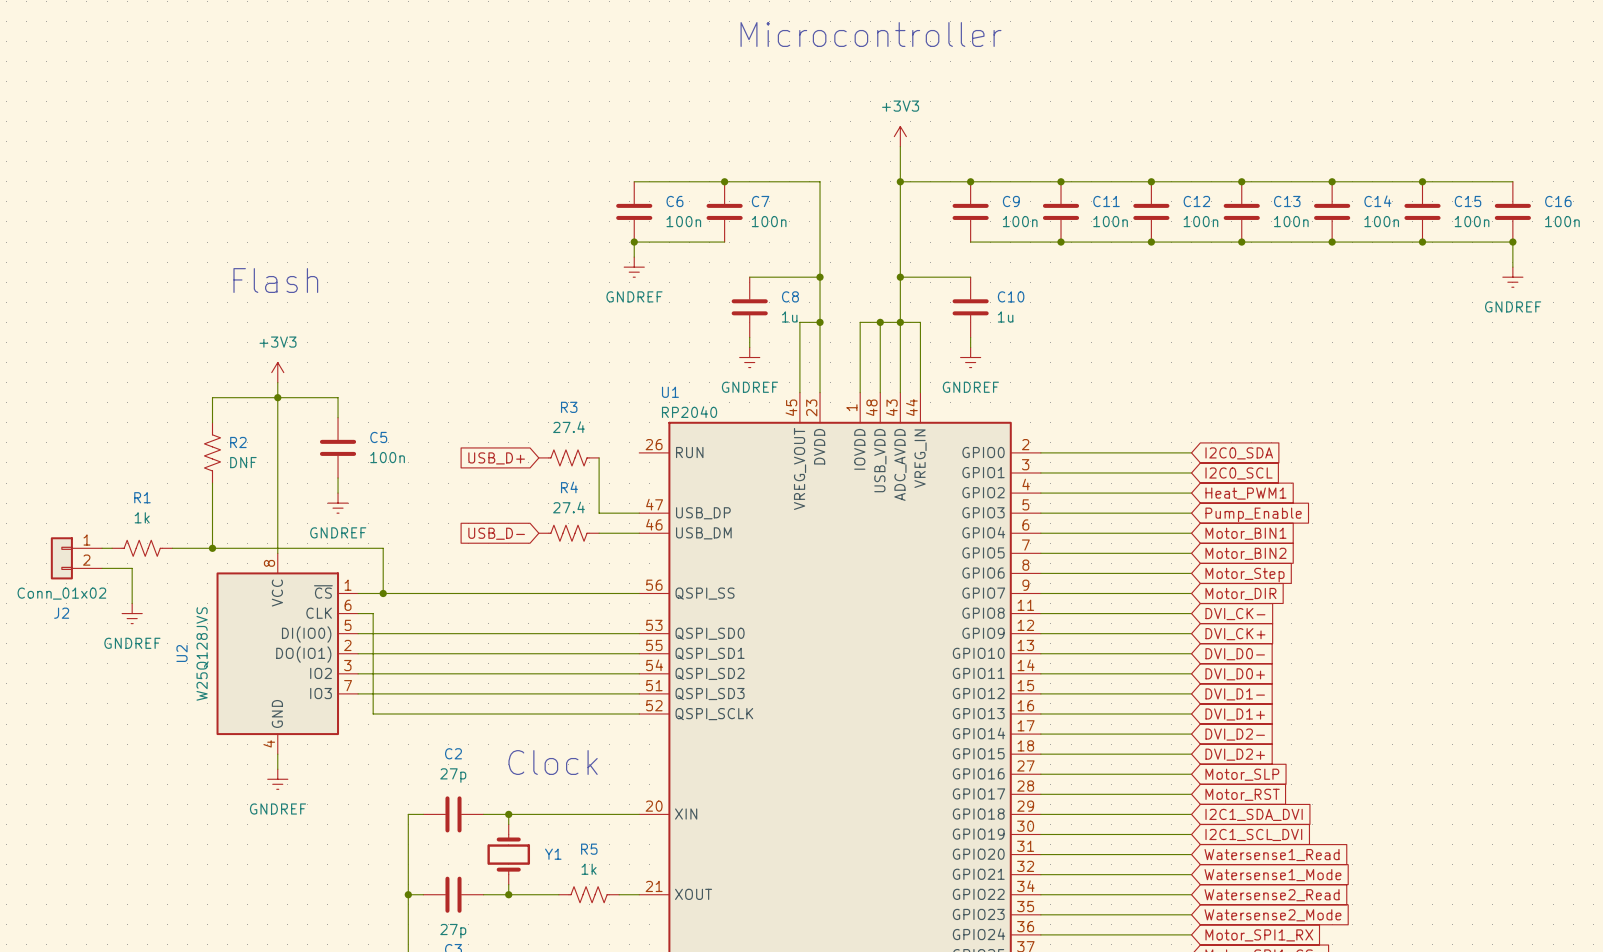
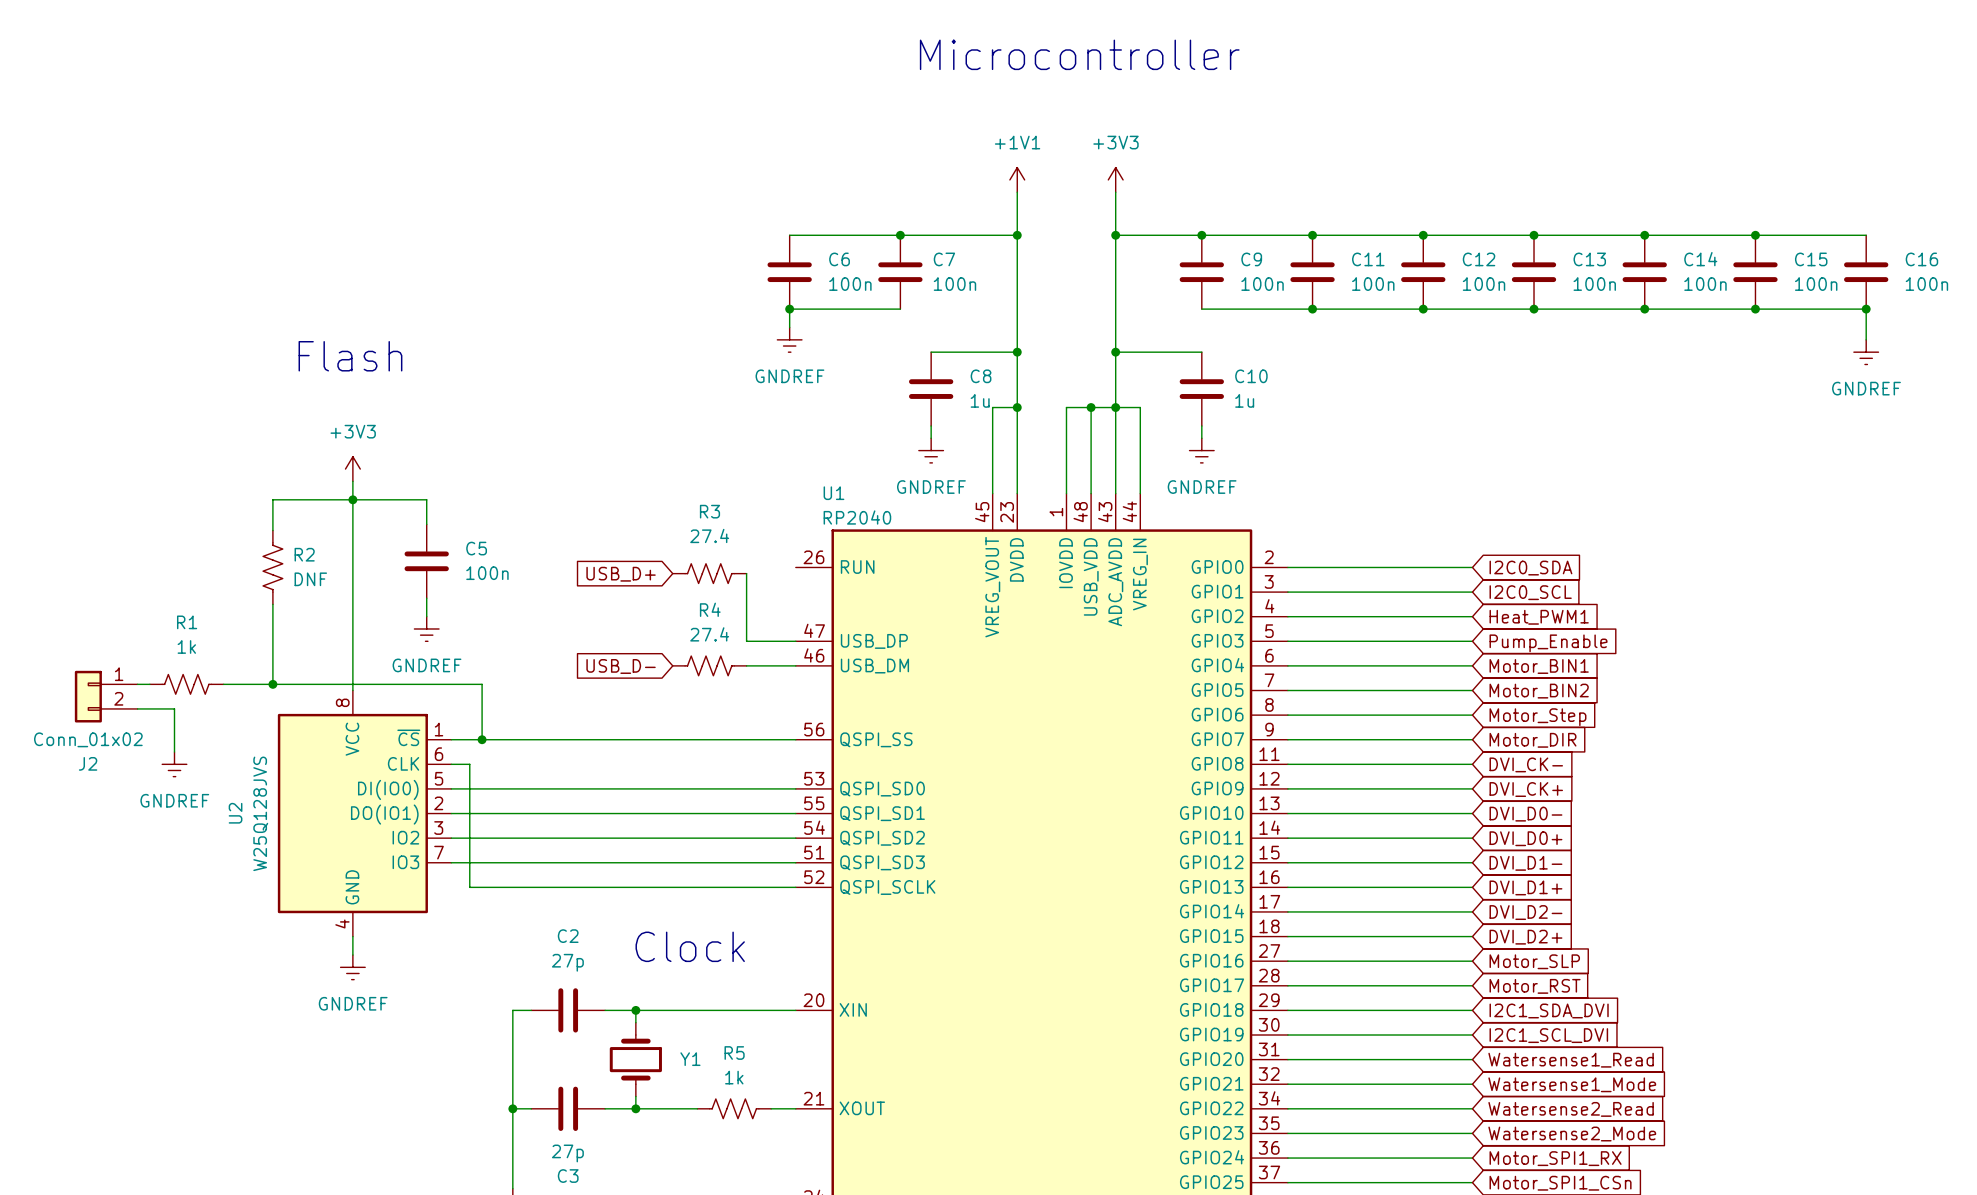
power symbol: none -> +1V1 (1017, 179)
wire: none -> (1017, 192) (1017, 235)
junction: none -> (1017, 235)

